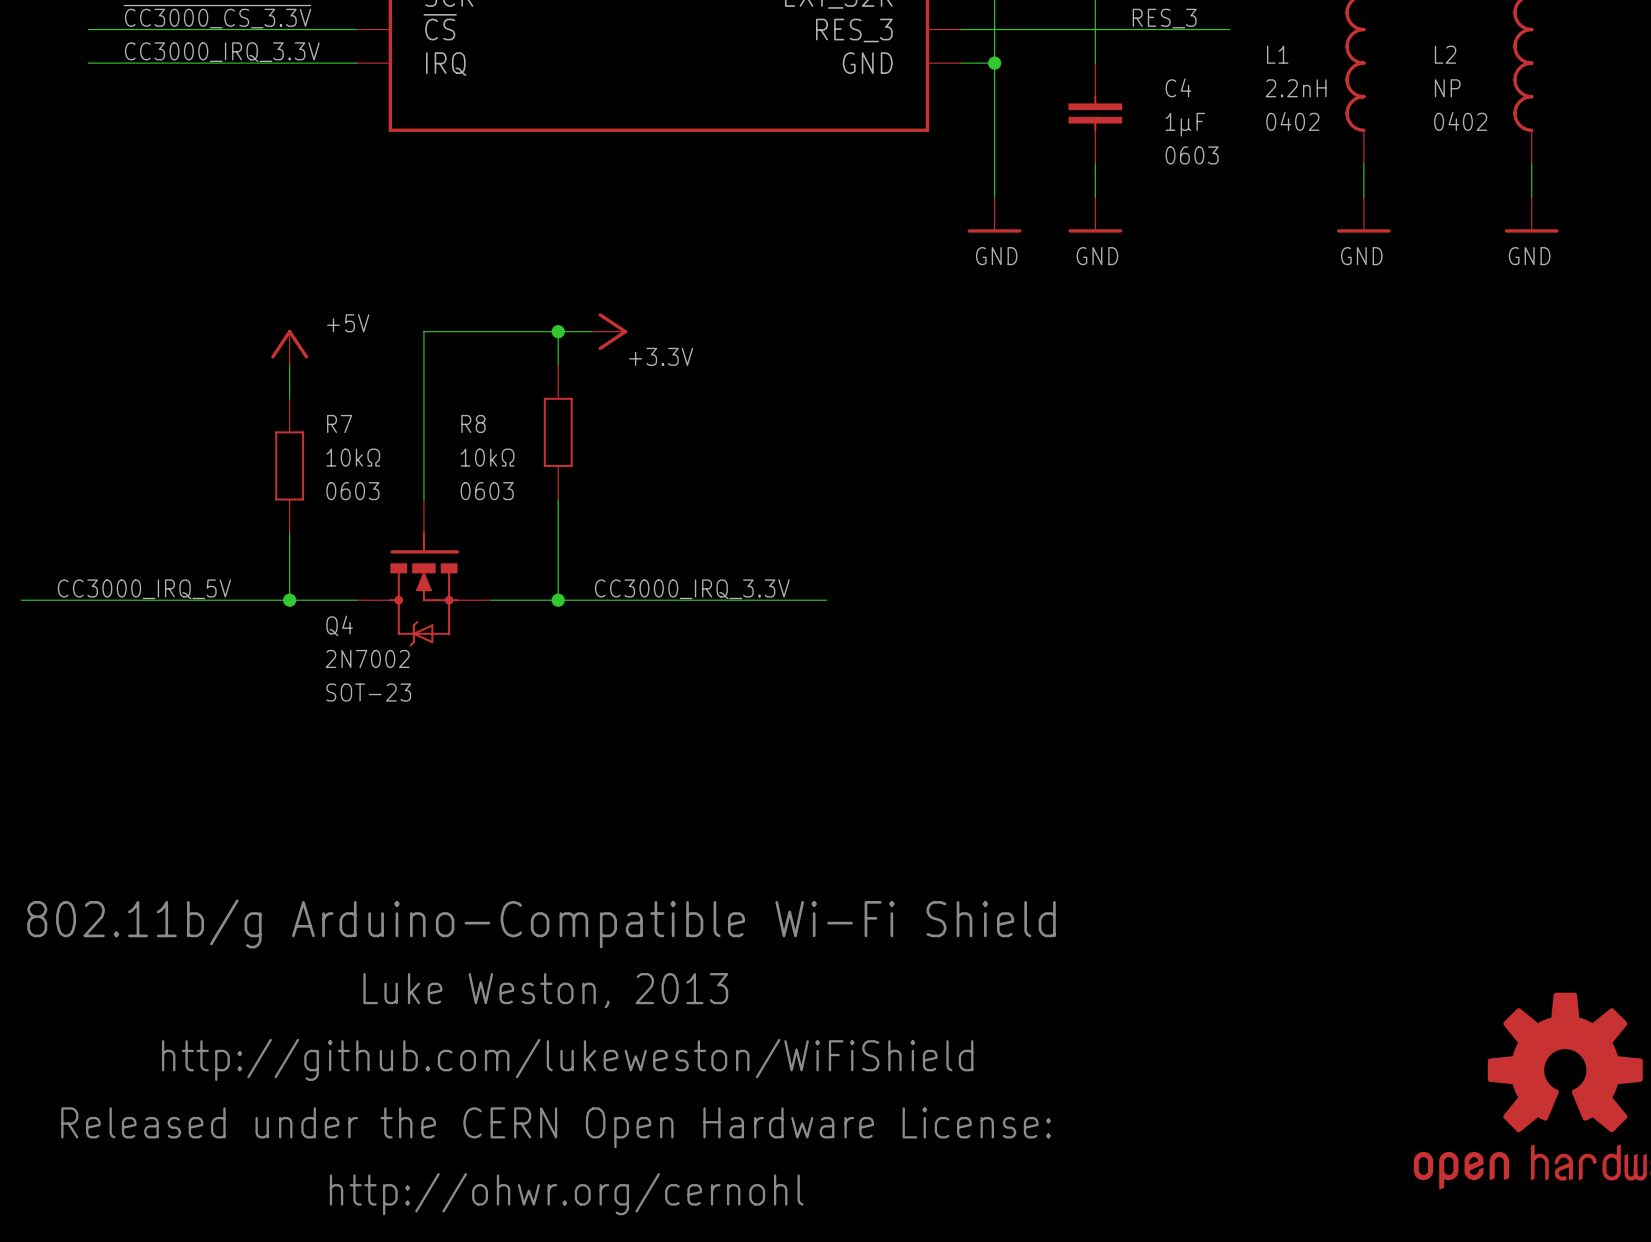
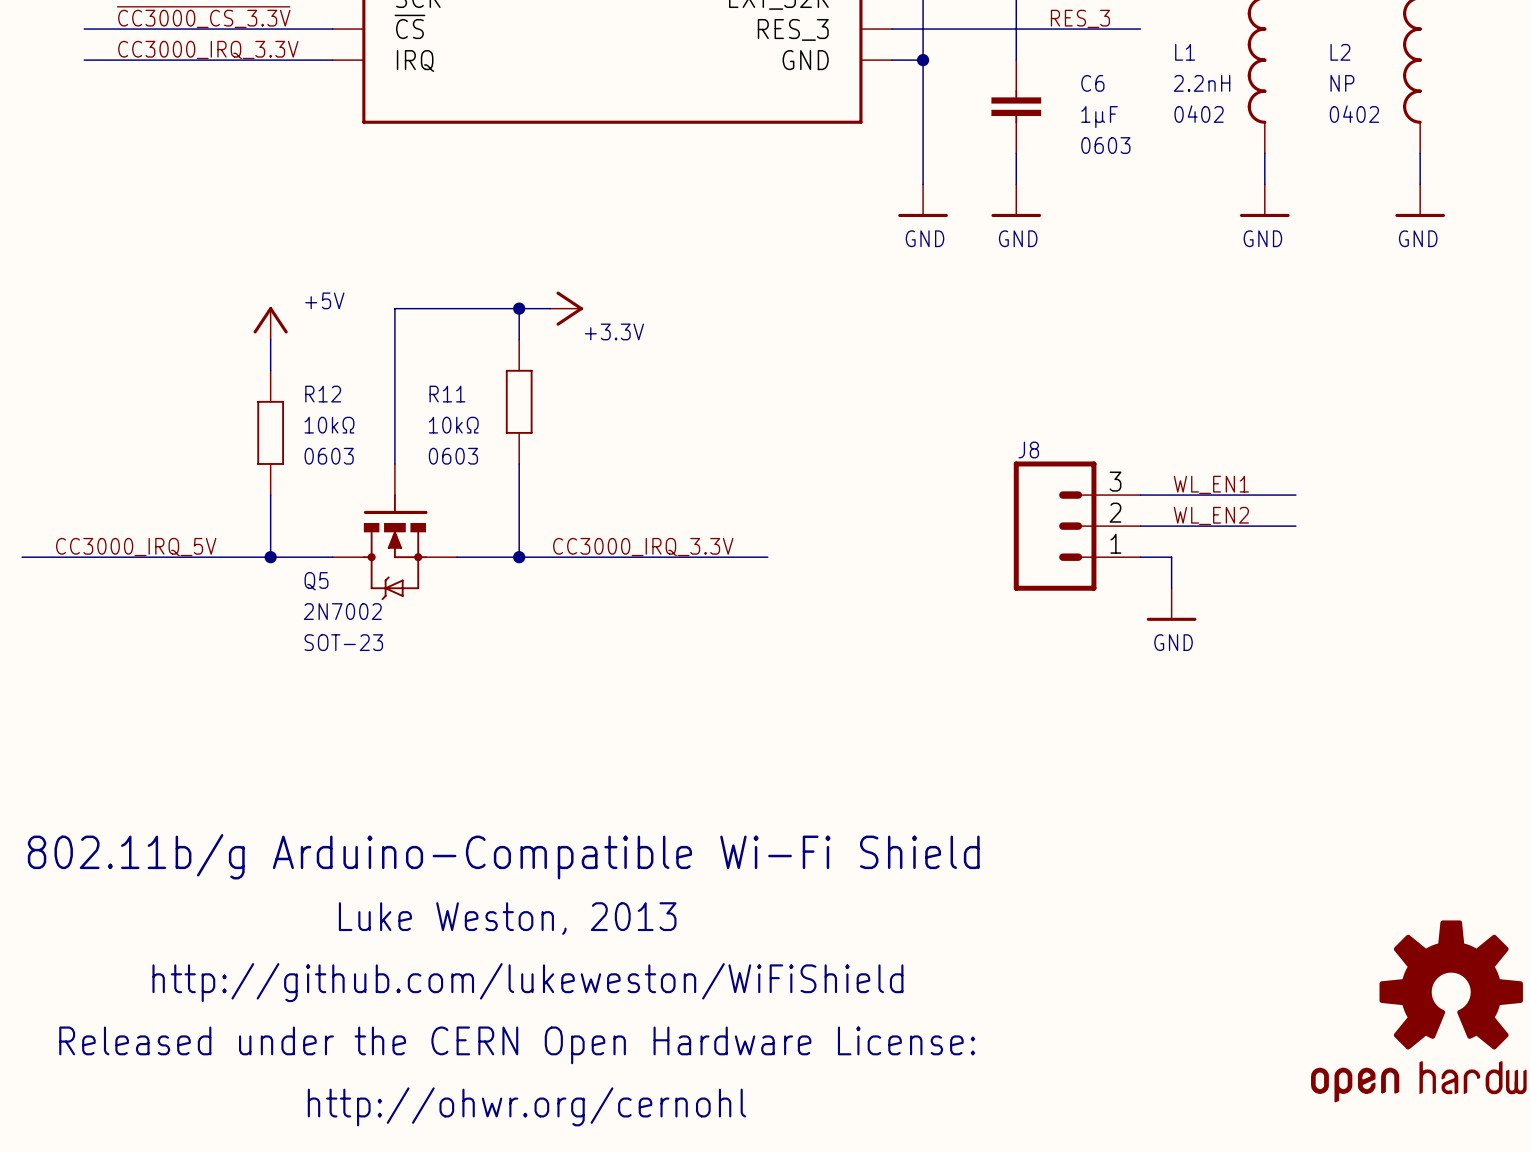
C4 name: C4 (1178, 87) -> C6 (1092, 83)
R7 name: R7 (339, 423) -> R12 (323, 394)
R8 name: R8 (473, 423) -> R11 (447, 394)
label: none -> WL_EN1 (1211, 484)
wire: none -> (1140, 495) (1295, 495)
label: none -> WL_EN2 (1211, 515)
J8: none -> (1077, 526)
wire: none -> (1140, 526) (1295, 526)
wire: none -> (1140, 557) (1171, 557) (1171, 588)
Q4 name: Q4 (339, 625) -> Q5 (316, 581)
power symbol: none -> GND (1171, 604)

